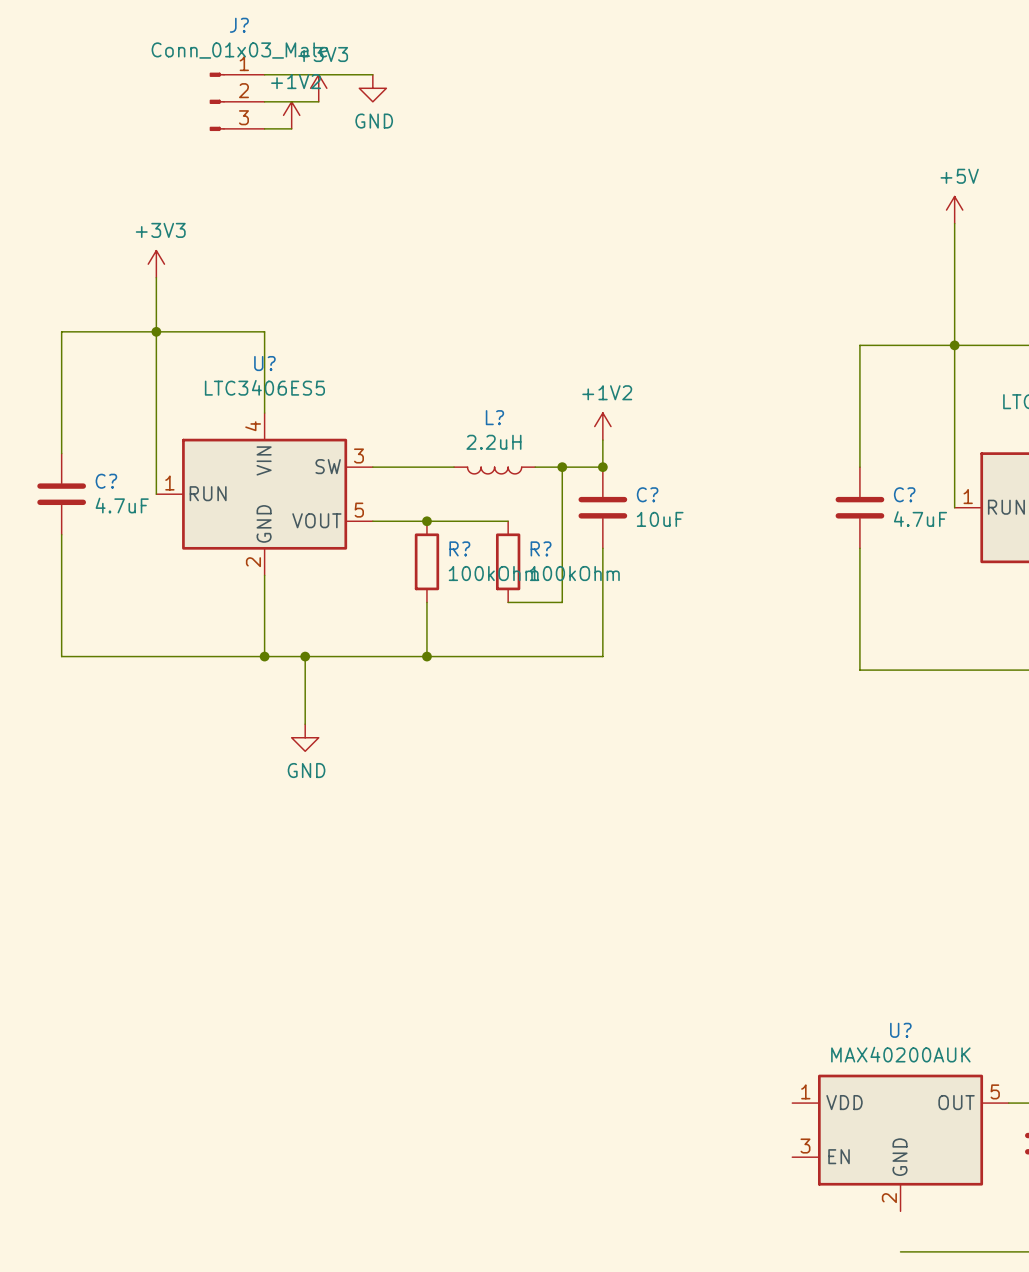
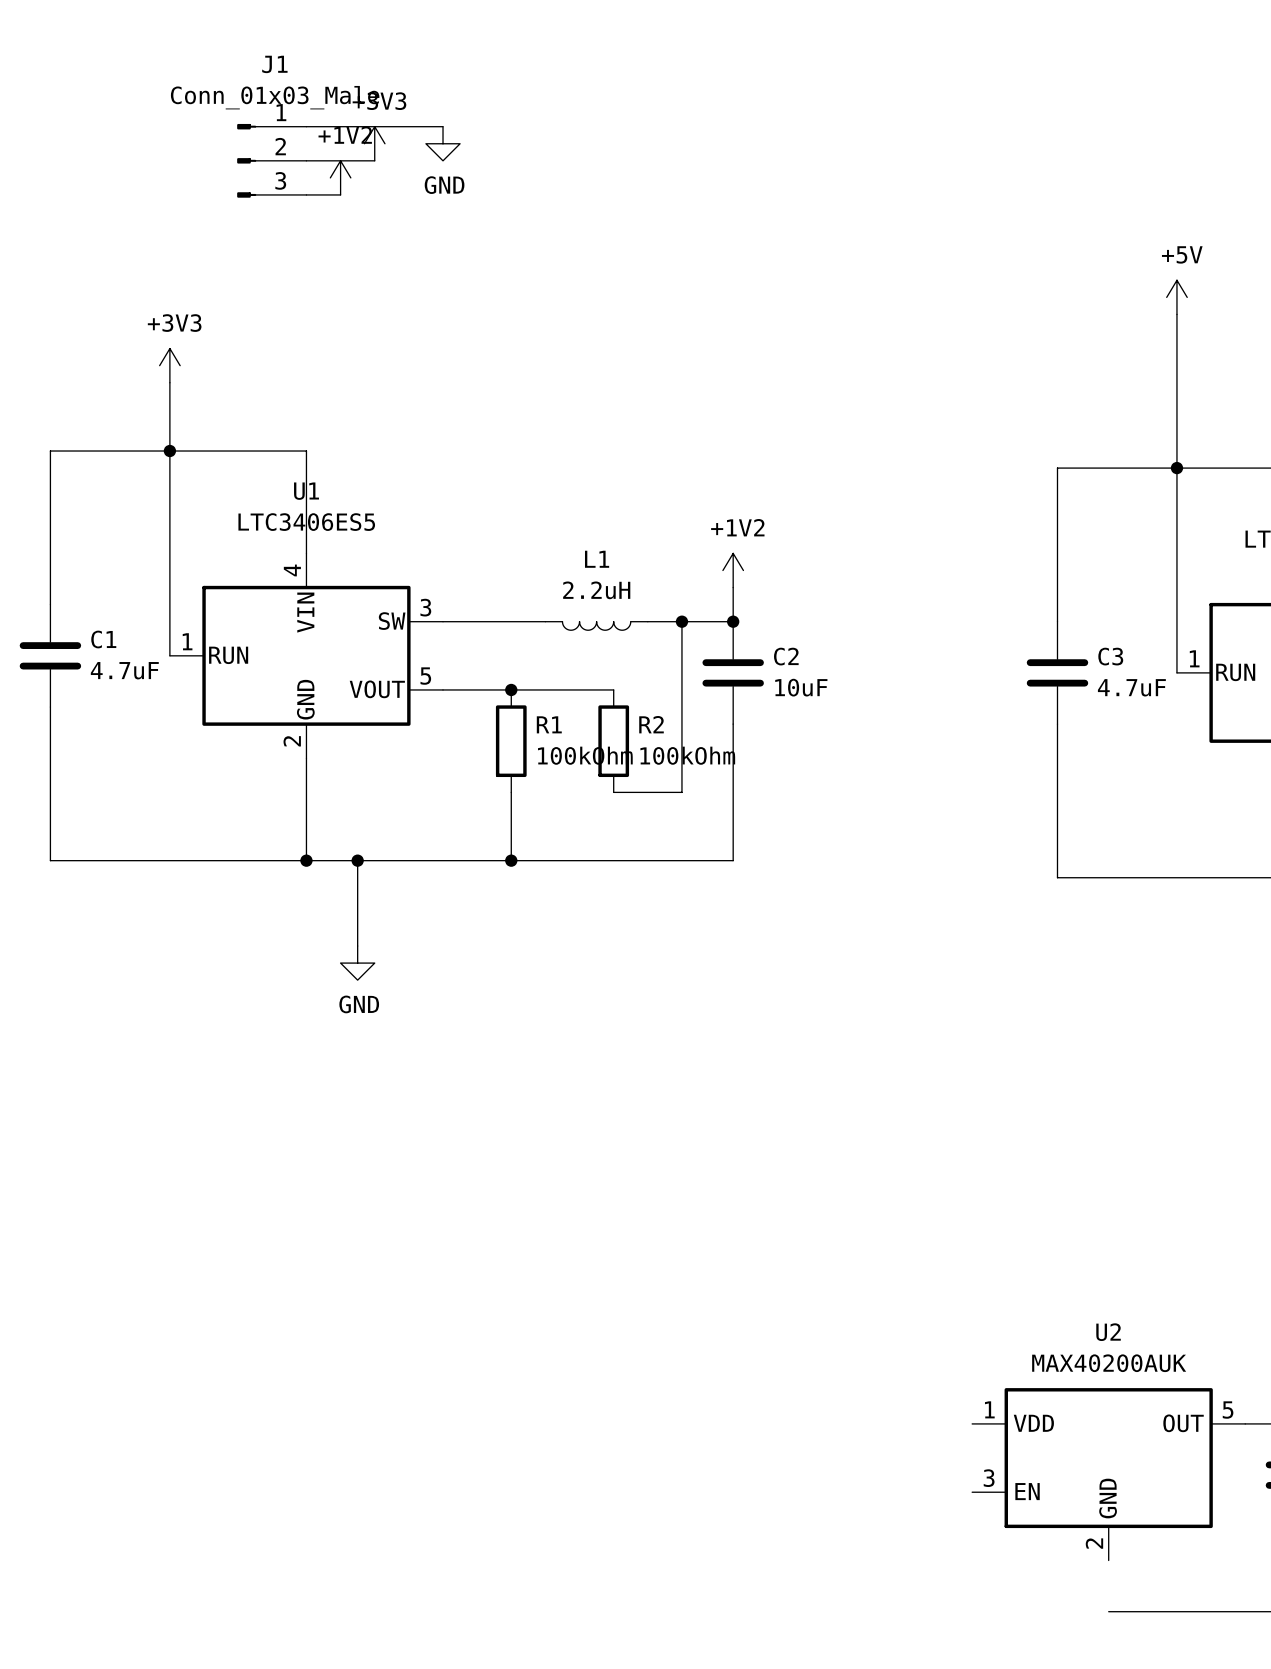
J? name: J? (239, 25) -> J1 (274, 64)
U? name: U? (264, 363) -> U1 (306, 491)
L? name: L? (494, 417) -> L1 (597, 559)
C? name: C? (106, 481) -> C1 (103, 639)
C? name: C? (647, 494) -> C2 (786, 656)
C? name: C? (904, 494) -> C3 (1110, 656)
R? name: R? (459, 548) -> R1 (549, 724)
R? name: R? (541, 548) -> R2 (651, 724)
U? name: U? (900, 1030) -> U2 (1108, 1332)

